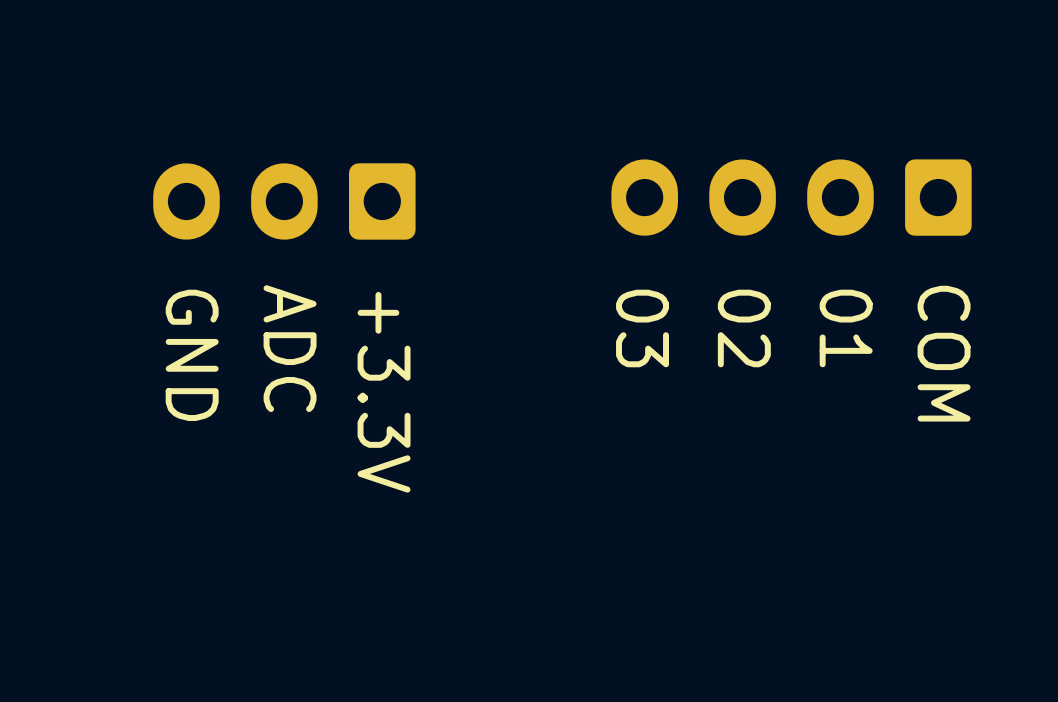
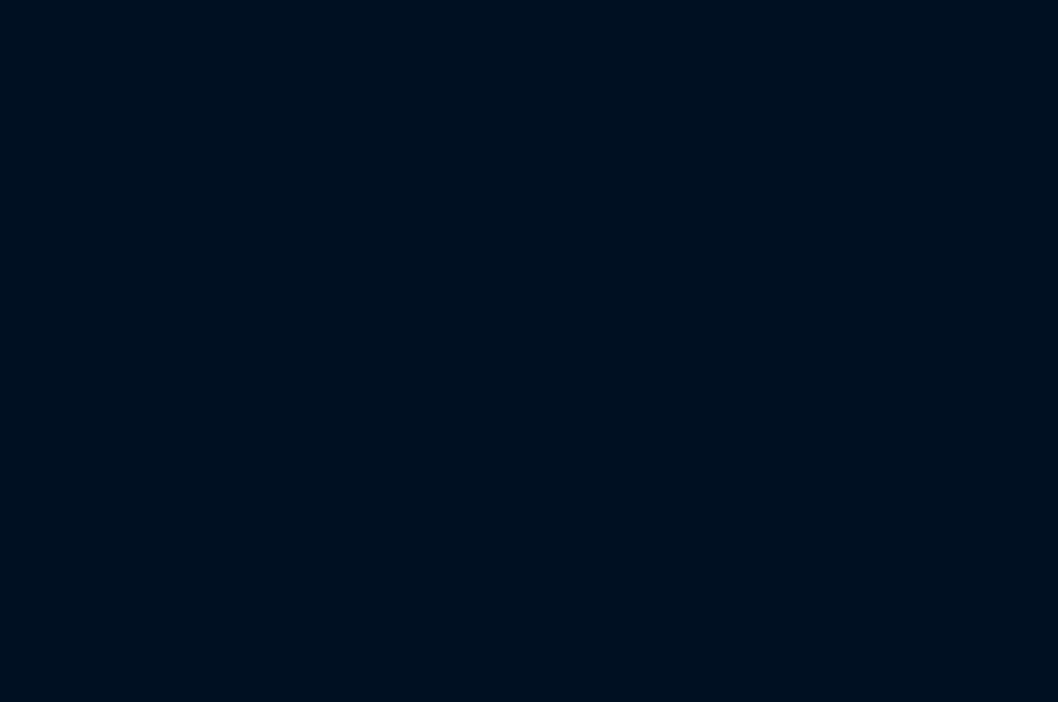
part: (791, 197) -> none
part: (284, 201) -> none
text: 03 (642, 328) -> none
text: 02 (744, 328) -> none
text: 01 (846, 328) -> none
text: ADC (290, 348) -> none
text: COM (944, 353) -> none
text: GND (192, 355) -> none
text: +3.3V (384, 392) -> none

